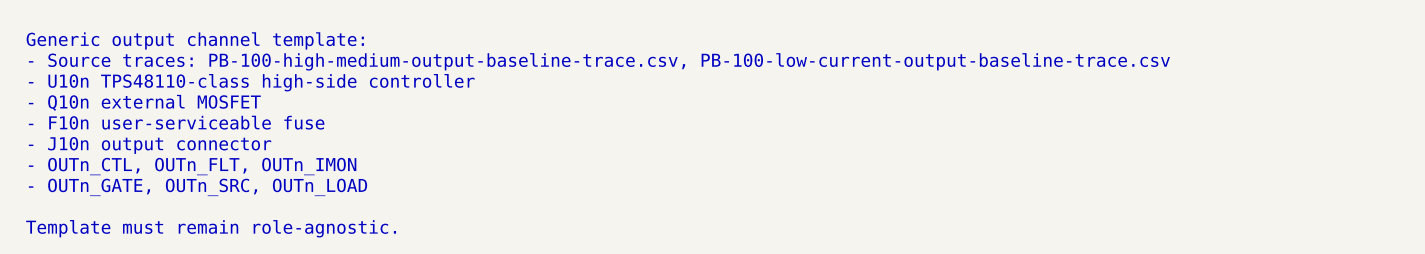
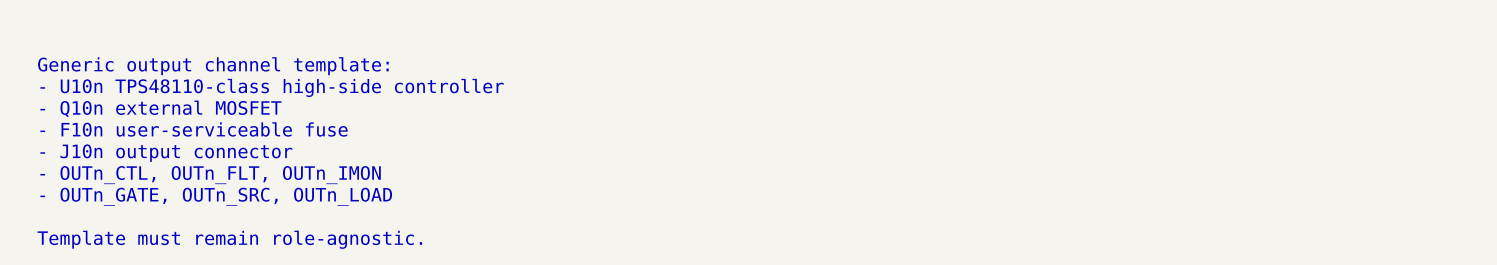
text: Generic output channel template: (195, 40) -> none
text: - Source traces: PB-100-high-medium-output-baseline-trace.csv, PB-100-low-current-output-baseline-trace.csv (599, 61) -> Generic output channel template: (213, 66)

